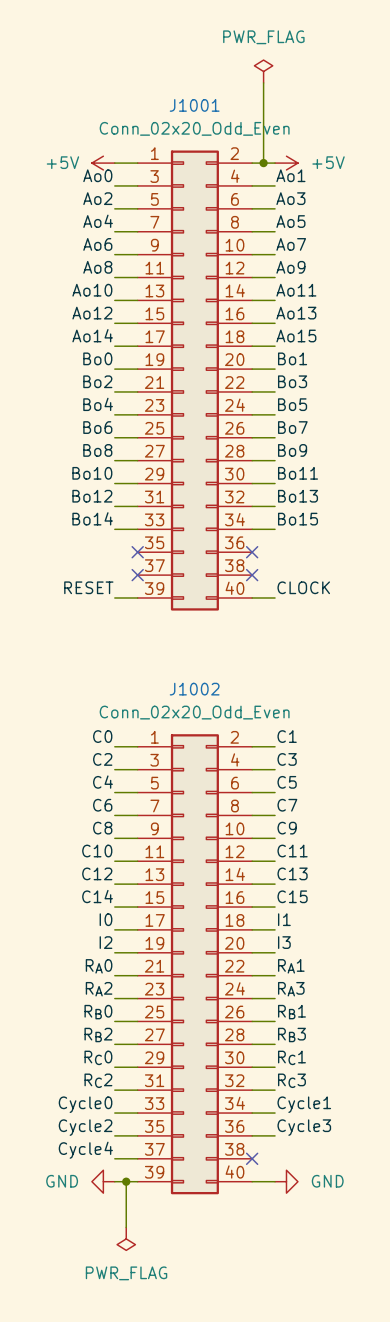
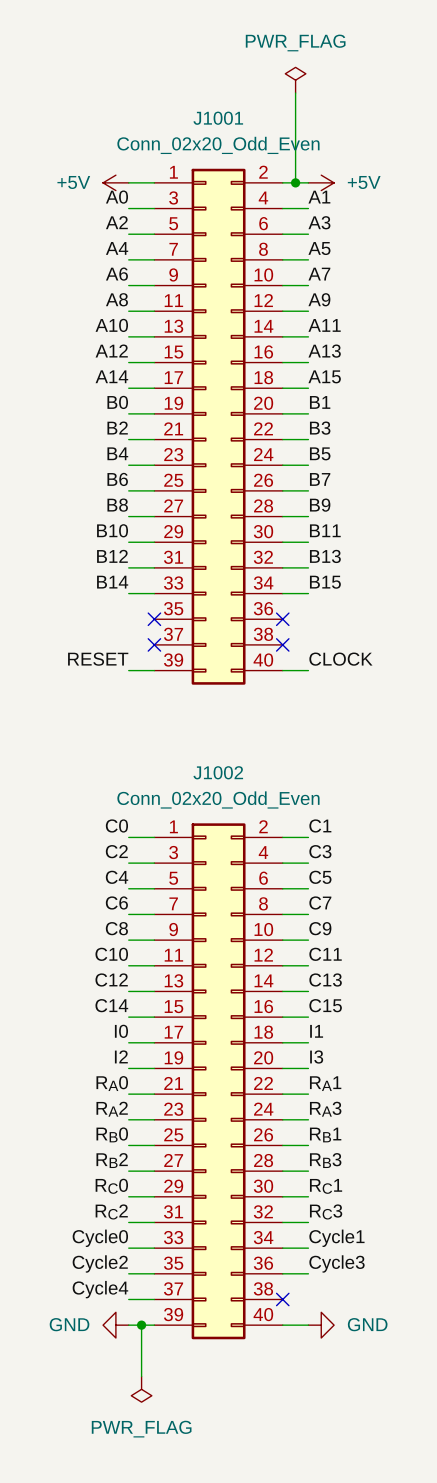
label: Ao0 (97, 175) -> A0 (116, 197)
label: Ao1 (290, 175) -> A1 (319, 197)
label: Ao2 (97, 198) -> A2 (116, 222)
label: Ao3 (290, 198) -> A3 (319, 222)
label: Ao4 (98, 221) -> A4 (117, 248)
label: Ao5 (290, 221) -> A5 (319, 248)
label: Ao6 (97, 244) -> A6 (116, 274)
label: Ao7 (291, 244) -> A7 (319, 274)
label: Ao8 (97, 267) -> A8 (116, 299)
label: Ao9 (290, 267) -> A9 (319, 299)
label: Ao10 (92, 290) -> A10 (111, 325)
label: Ao11 (296, 290) -> A11 (324, 325)
label: Ao12 (92, 313) -> A12 (111, 351)
label: Ao13 (296, 313) -> A13 (324, 351)
label: Ao14 (92, 335) -> A14 (111, 376)
label: Ao15 (296, 335) -> A15 (324, 376)
label: Bo0 (97, 358) -> B0 (117, 402)
label: Bo1 (292, 358) -> B1 (320, 402)
label: Bo2 (97, 381) -> B2 (117, 428)
label: Bo3 (292, 381) -> B3 (320, 428)
label: Bo4 (98, 404) -> B4 (117, 453)
label: Bo5 (292, 404) -> B5 (320, 453)
label: Bo6 (97, 427) -> B6 (117, 479)
label: Bo7 (292, 427) -> B7 (320, 479)
label: Bo8 (97, 450) -> B8 (117, 505)
label: Bo9 (292, 450) -> B9 (320, 505)
label: Bo10 (92, 473) -> B10 (112, 530)
label: Bo11 (298, 473) -> B11 (325, 530)
label: Bo12 (92, 496) -> B12 (112, 556)
label: Bo13 (298, 496) -> B13 (325, 556)
label: Bo14 (92, 518) -> B14 (112, 582)
label: Bo15 (298, 519) -> B15 (325, 582)

